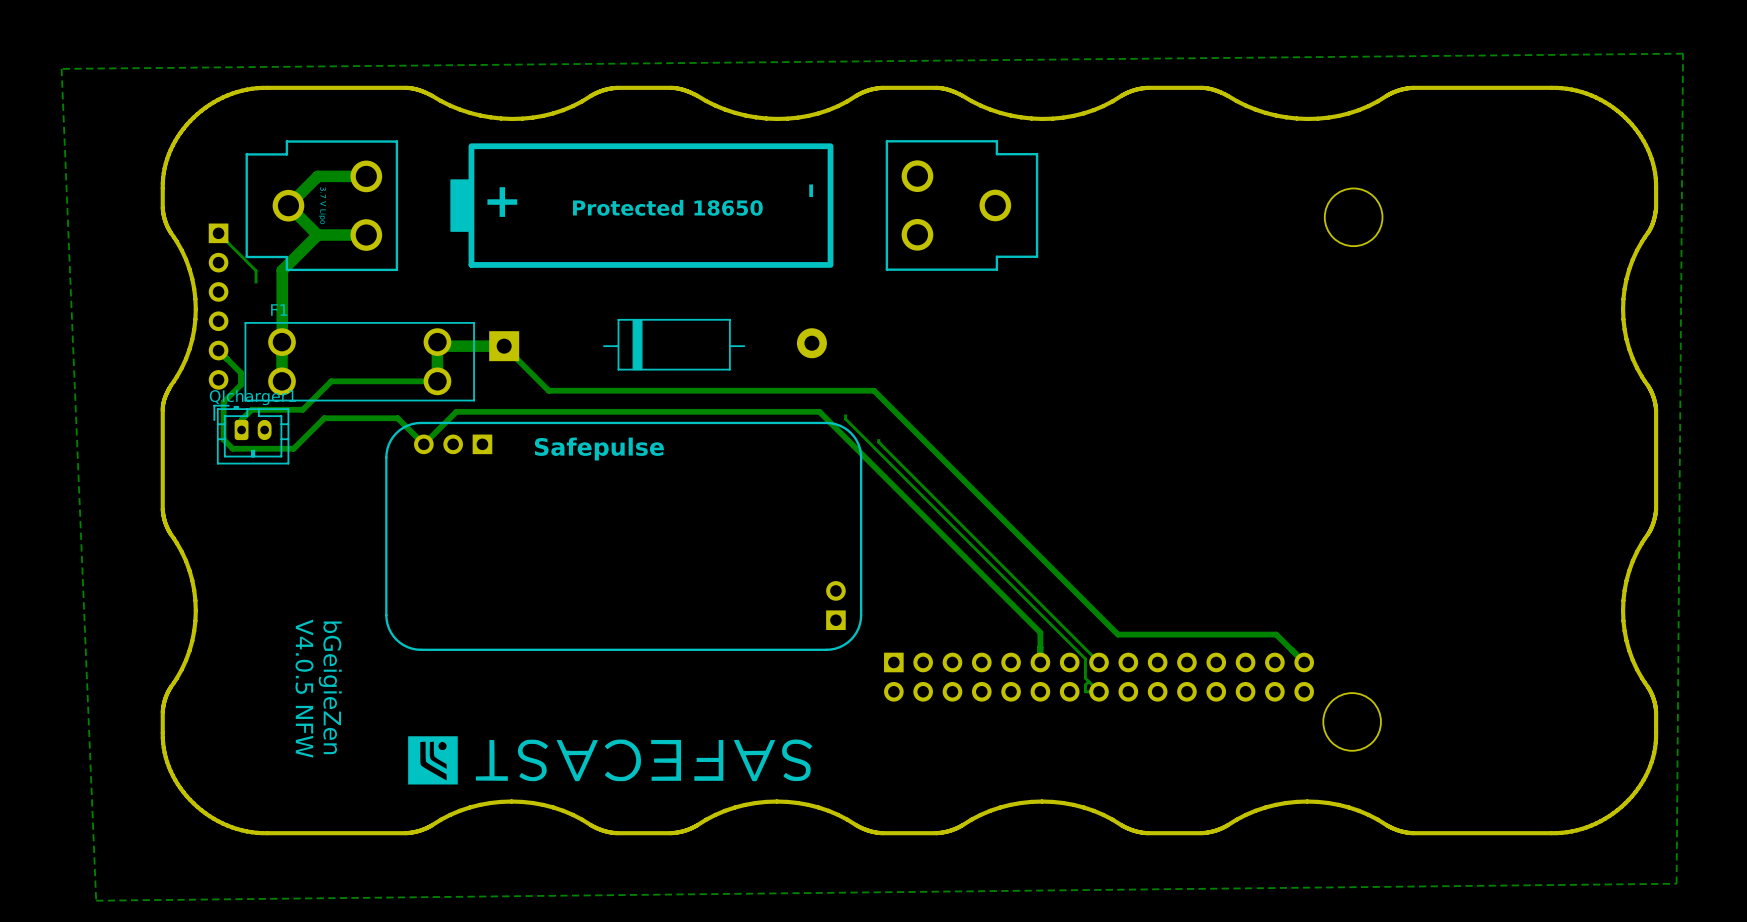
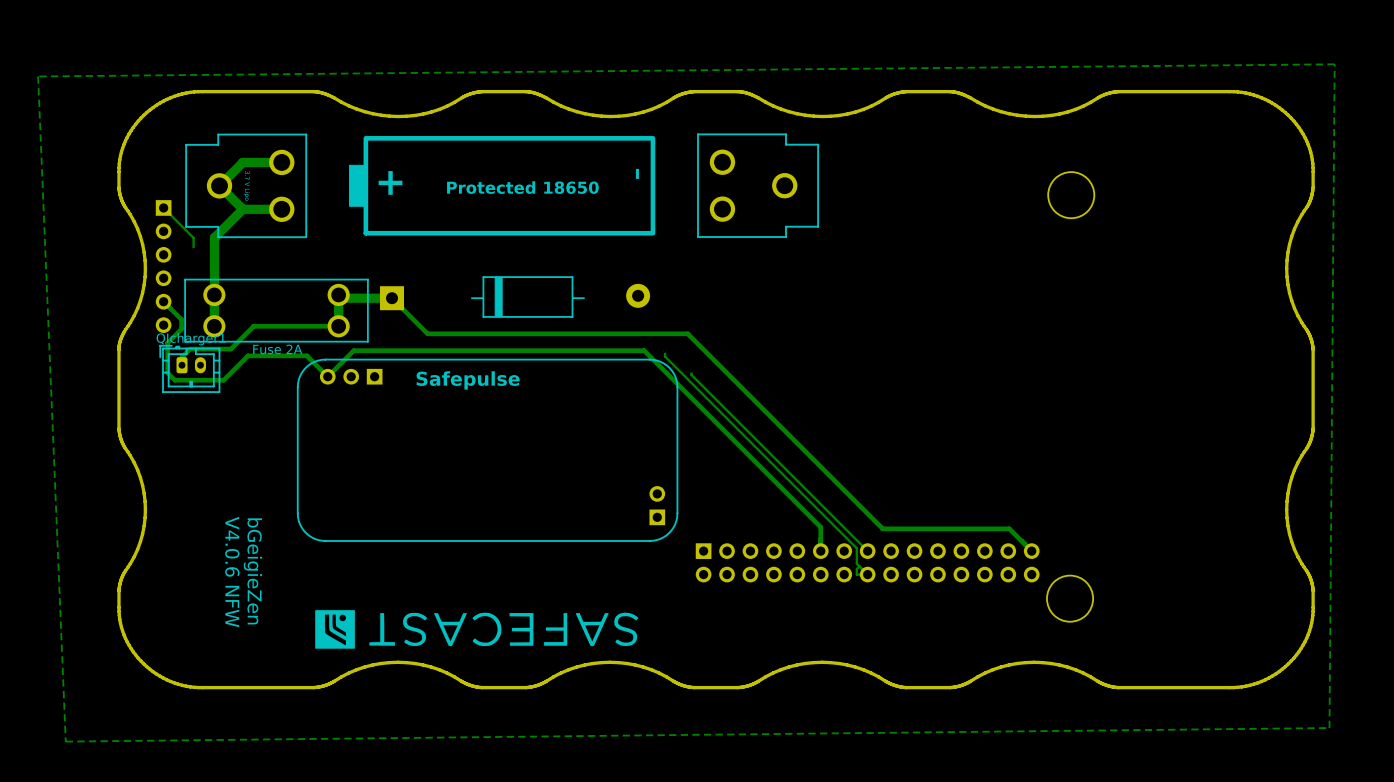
F1 name: F1 (279, 309) -> Fuse 2A (277, 349)
text: V4.0.5 NFW (304, 688) -> V4.0.6 NFW (232, 572)

